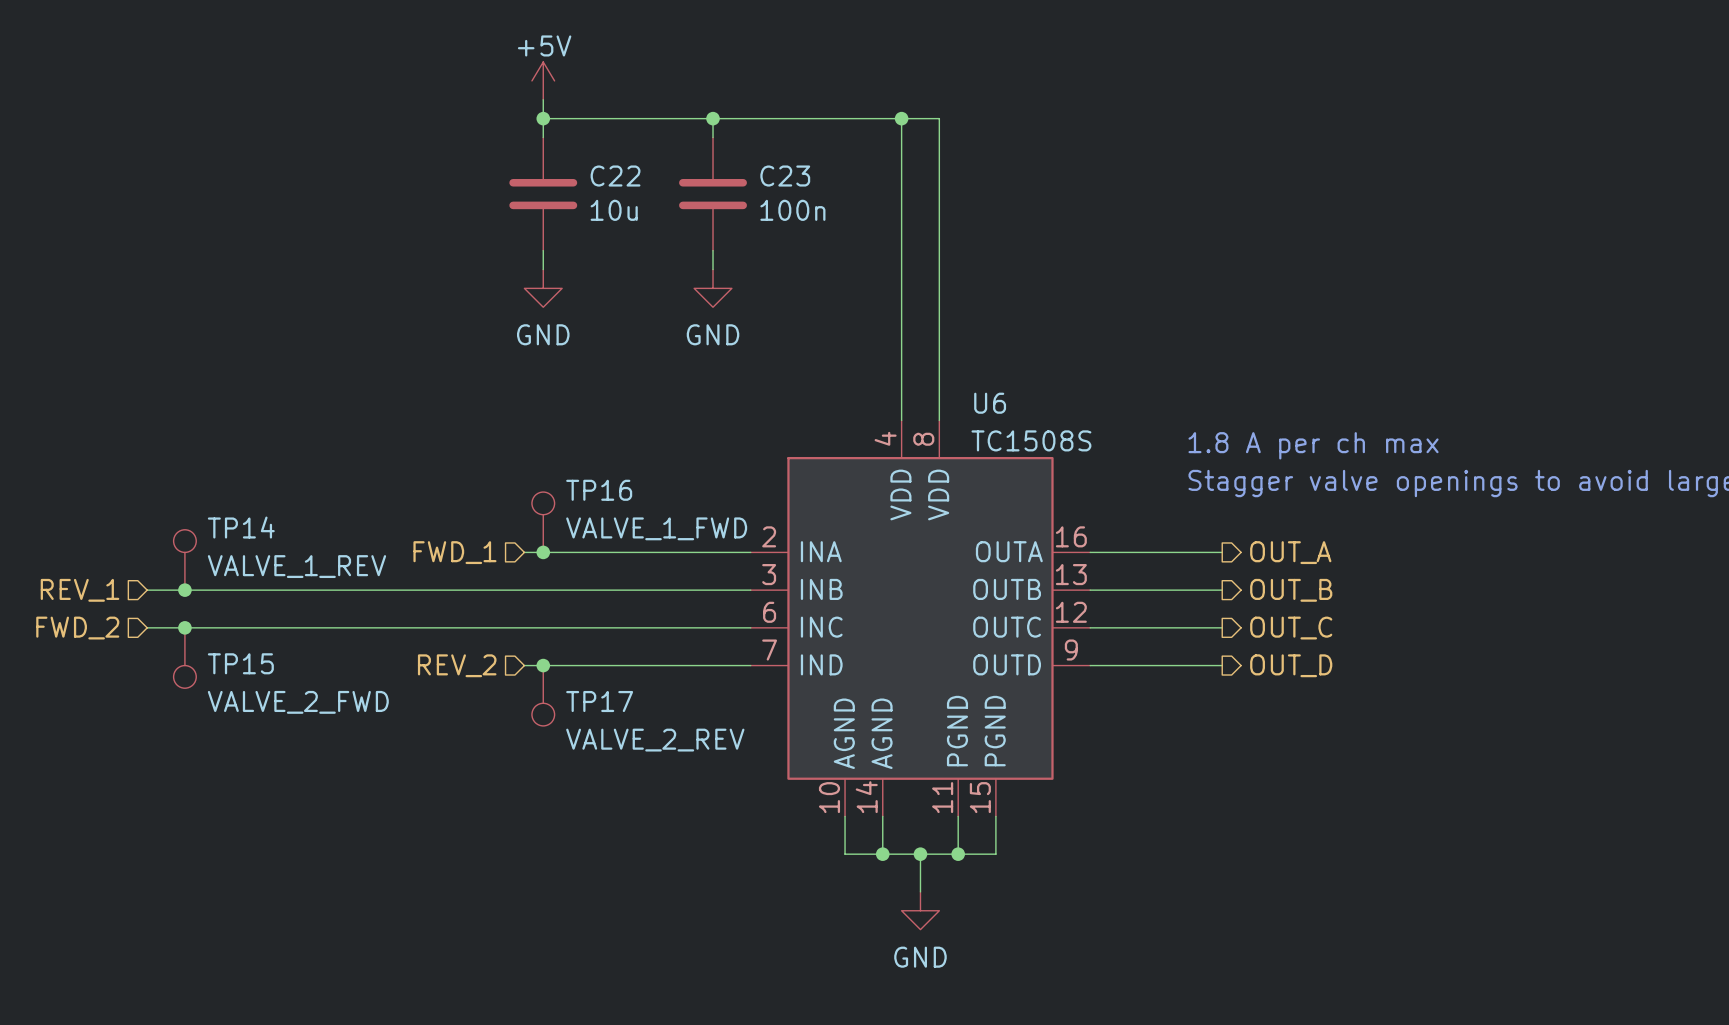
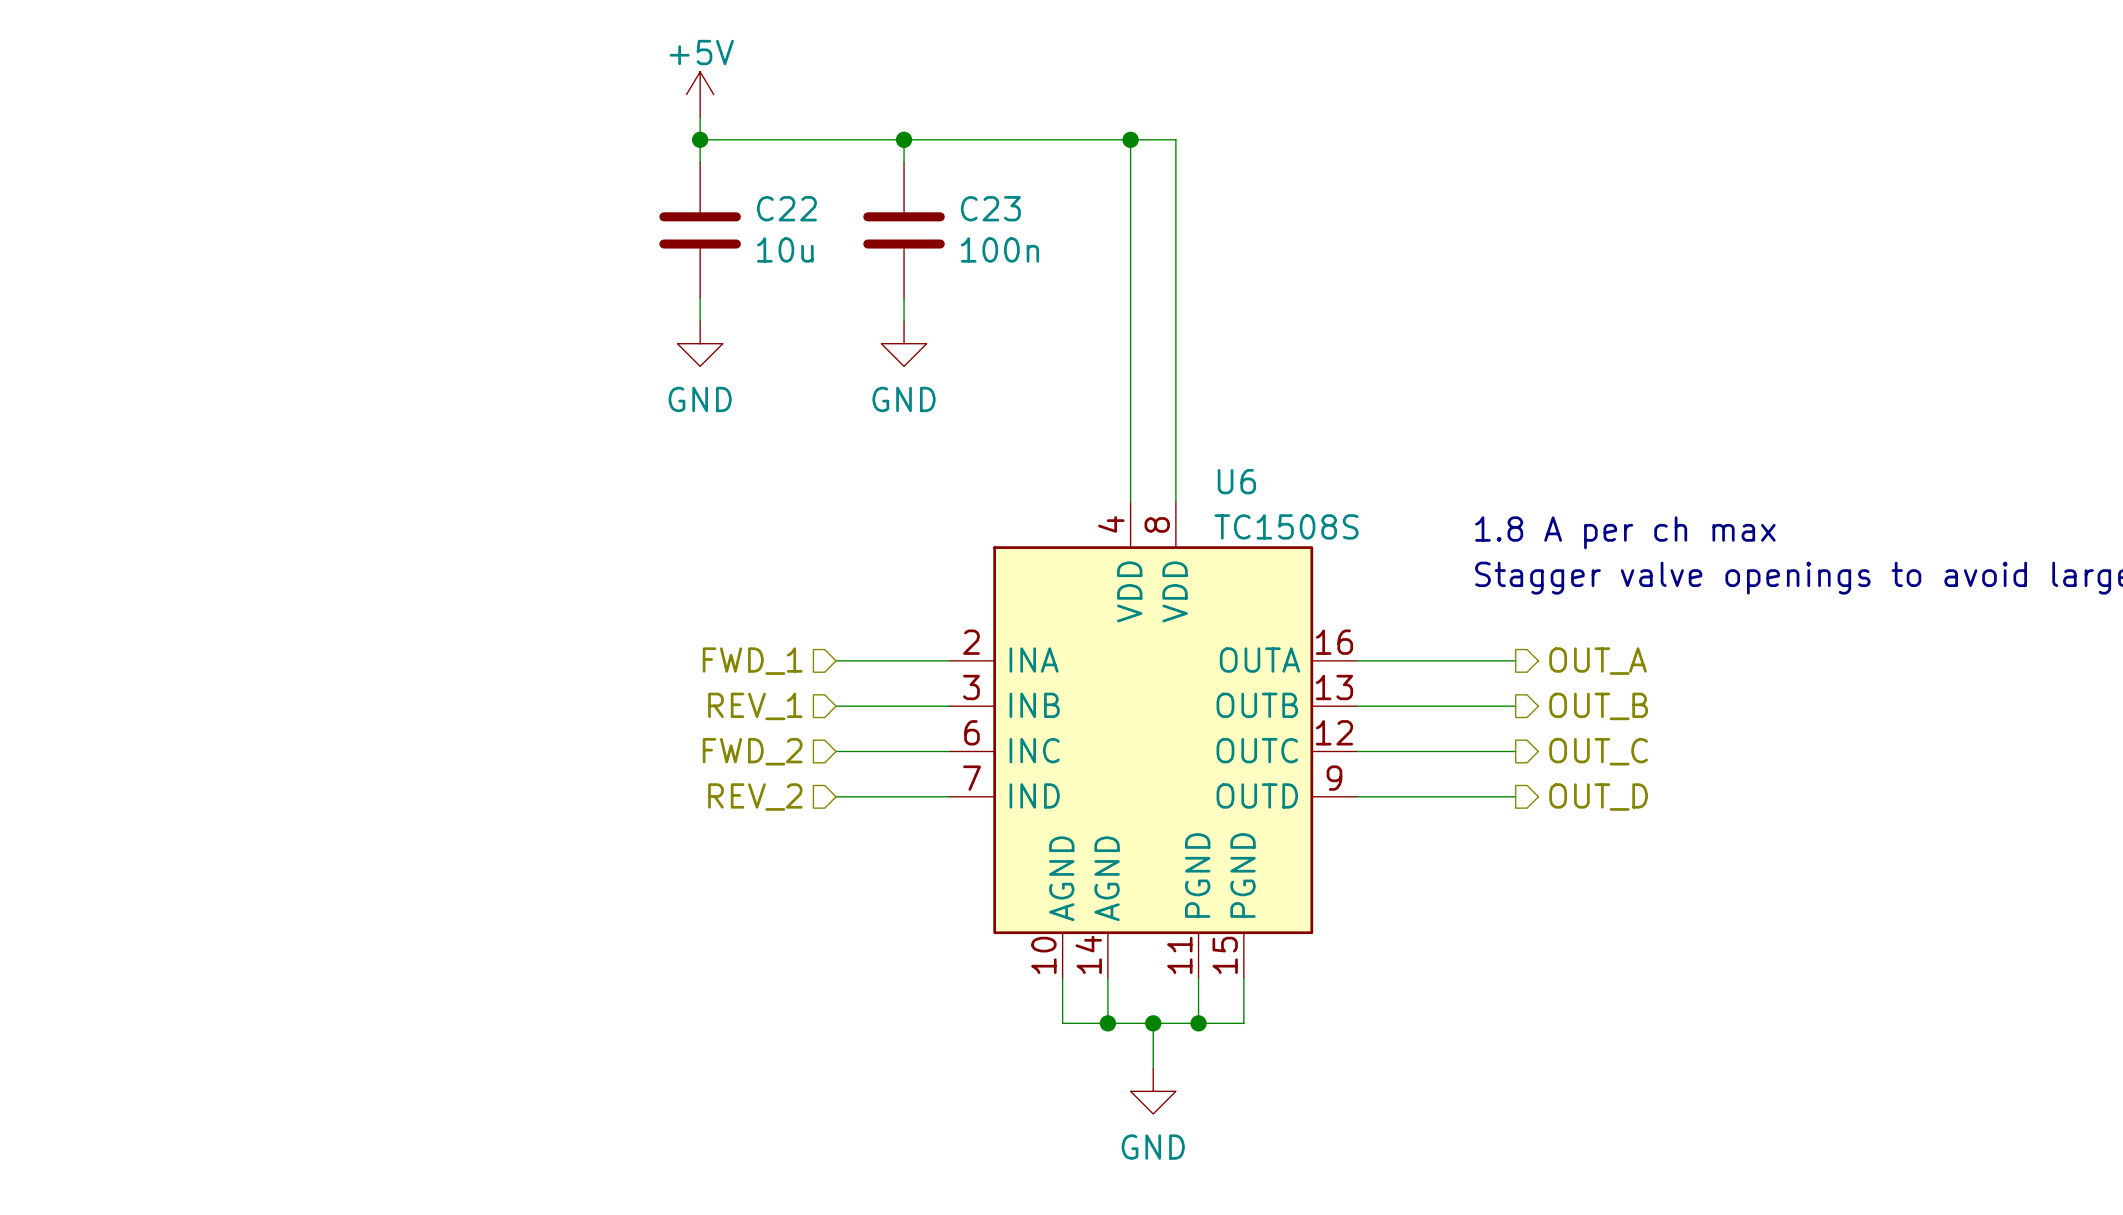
TP16: VALVE_1_FWD (543, 522) -> none
hierarchical label position: FWD_1 (454, 552) -> FWD_1 (752, 661)
wire: (524, 552) (656, 552) -> none
junction: (543, 552) -> none
TP14: VALVE_1_REV (184, 559) -> none
hierarchical label: REV_1 (80, 590) -> none
wire: (147, 590) (656, 590) -> none
junction: (184, 590) -> none
hierarchical label: none -> REV_1 (755, 706)
wire: (147, 627) (656, 627) -> none
junction: (184, 627) -> none
hierarchical label: FWD_2 (77, 628) -> none
hierarchical label: none -> FWD_2 (752, 751)
TP15: VALVE_2_FWD (184, 658) -> none
hierarchical label position: REV_2 (457, 665) -> REV_2 (755, 797)
wire: (524, 665) (656, 665) -> none
junction: (543, 665) -> none
TP17: VALVE_2_REV (543, 695) -> none

